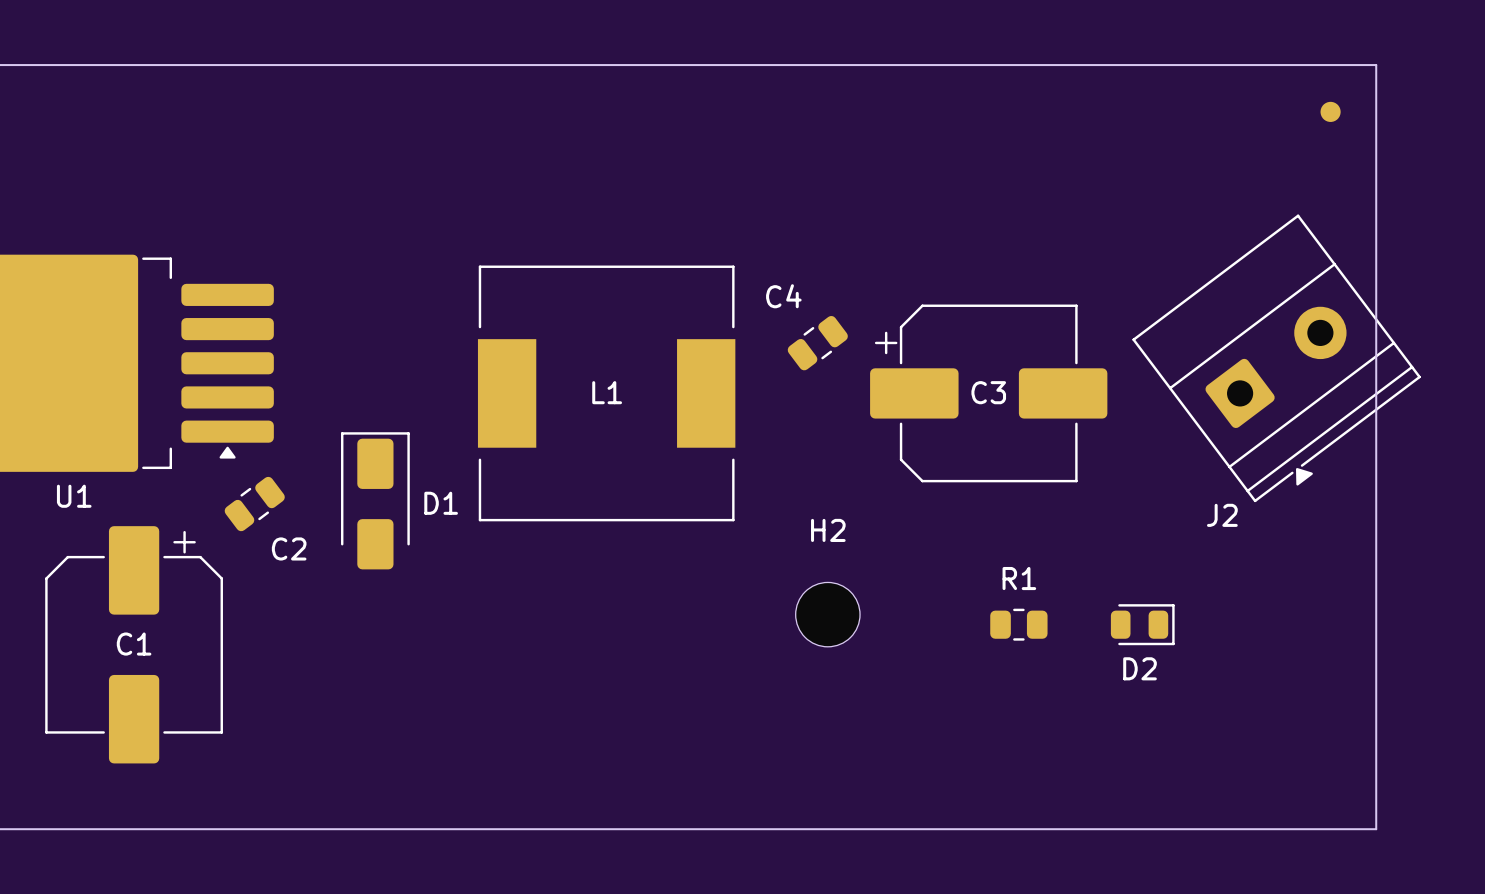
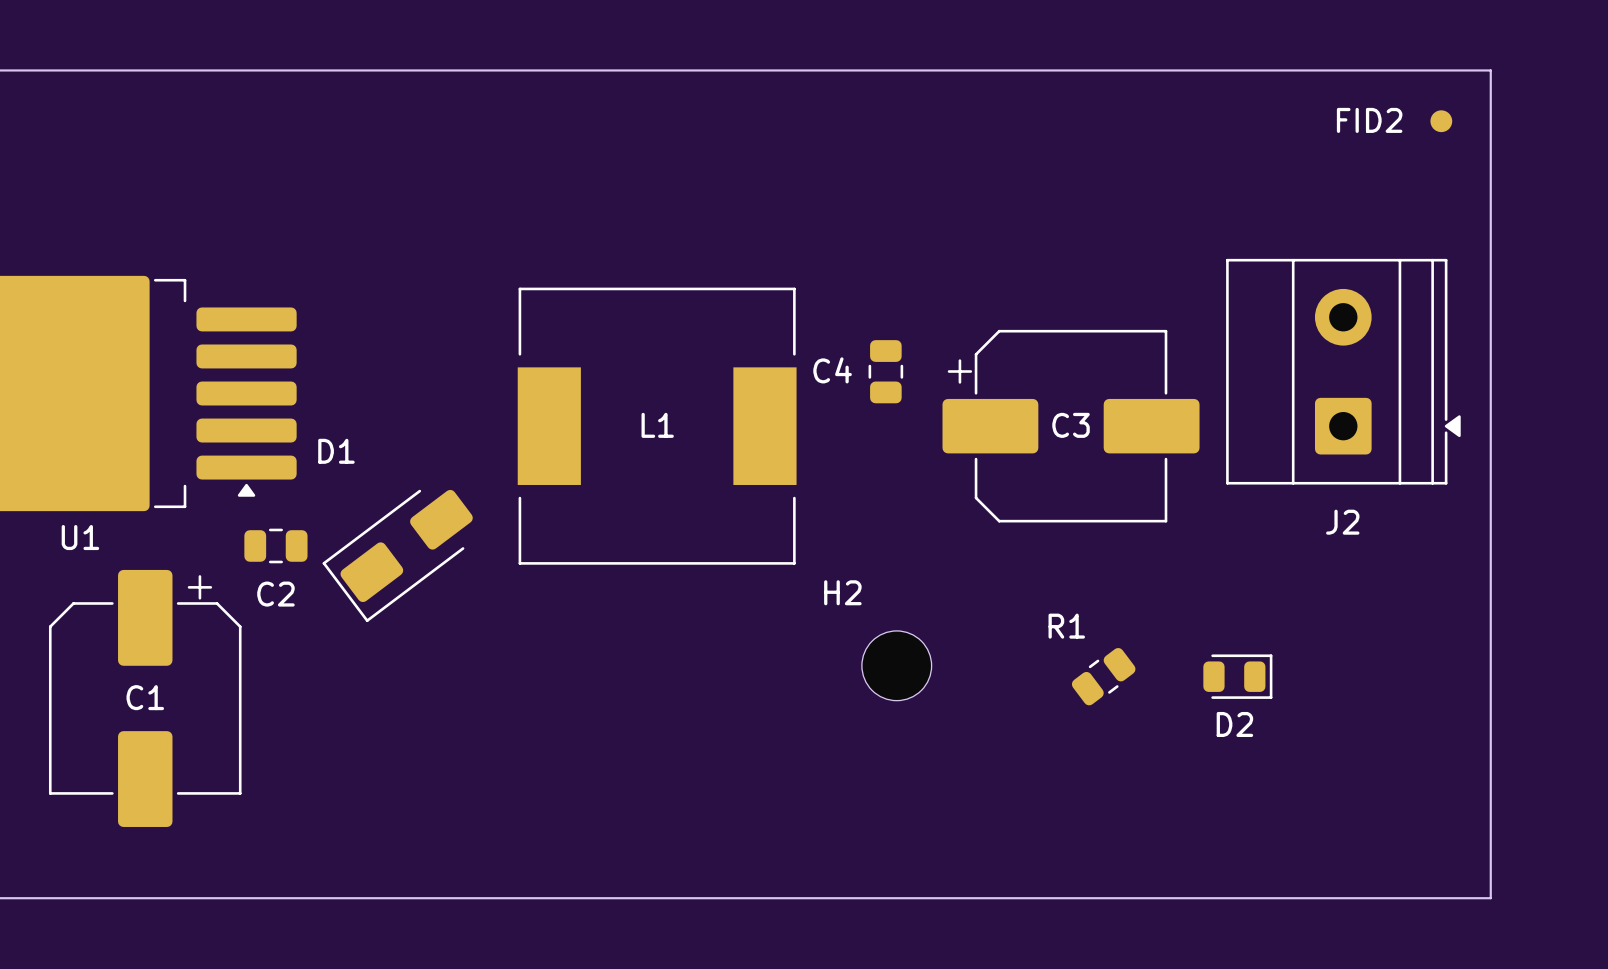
FID2 name: none -> FID2 (1369, 120)
C4 rotation: 0° (817, 343) -> 53° counterclockwise (885, 371)
J2 rotation: 0° (1276, 358) -> 53° counterclockwise (1343, 371)
D1 rotation: 0° (375, 500) -> 127° counterclockwise (397, 555)
D1 name position: D1 (441, 503) -> D1 (336, 451)
C2 rotation: 0° (254, 504) -> 37° clockwise (275, 545)
J2 name position: J2 (1222, 515) -> J2 (1342, 522)
H2 name position: H2 (828, 530) -> H2 (842, 592)
R1 rotation: 0° (1018, 624) -> 37° counterclockwise (1103, 676)

